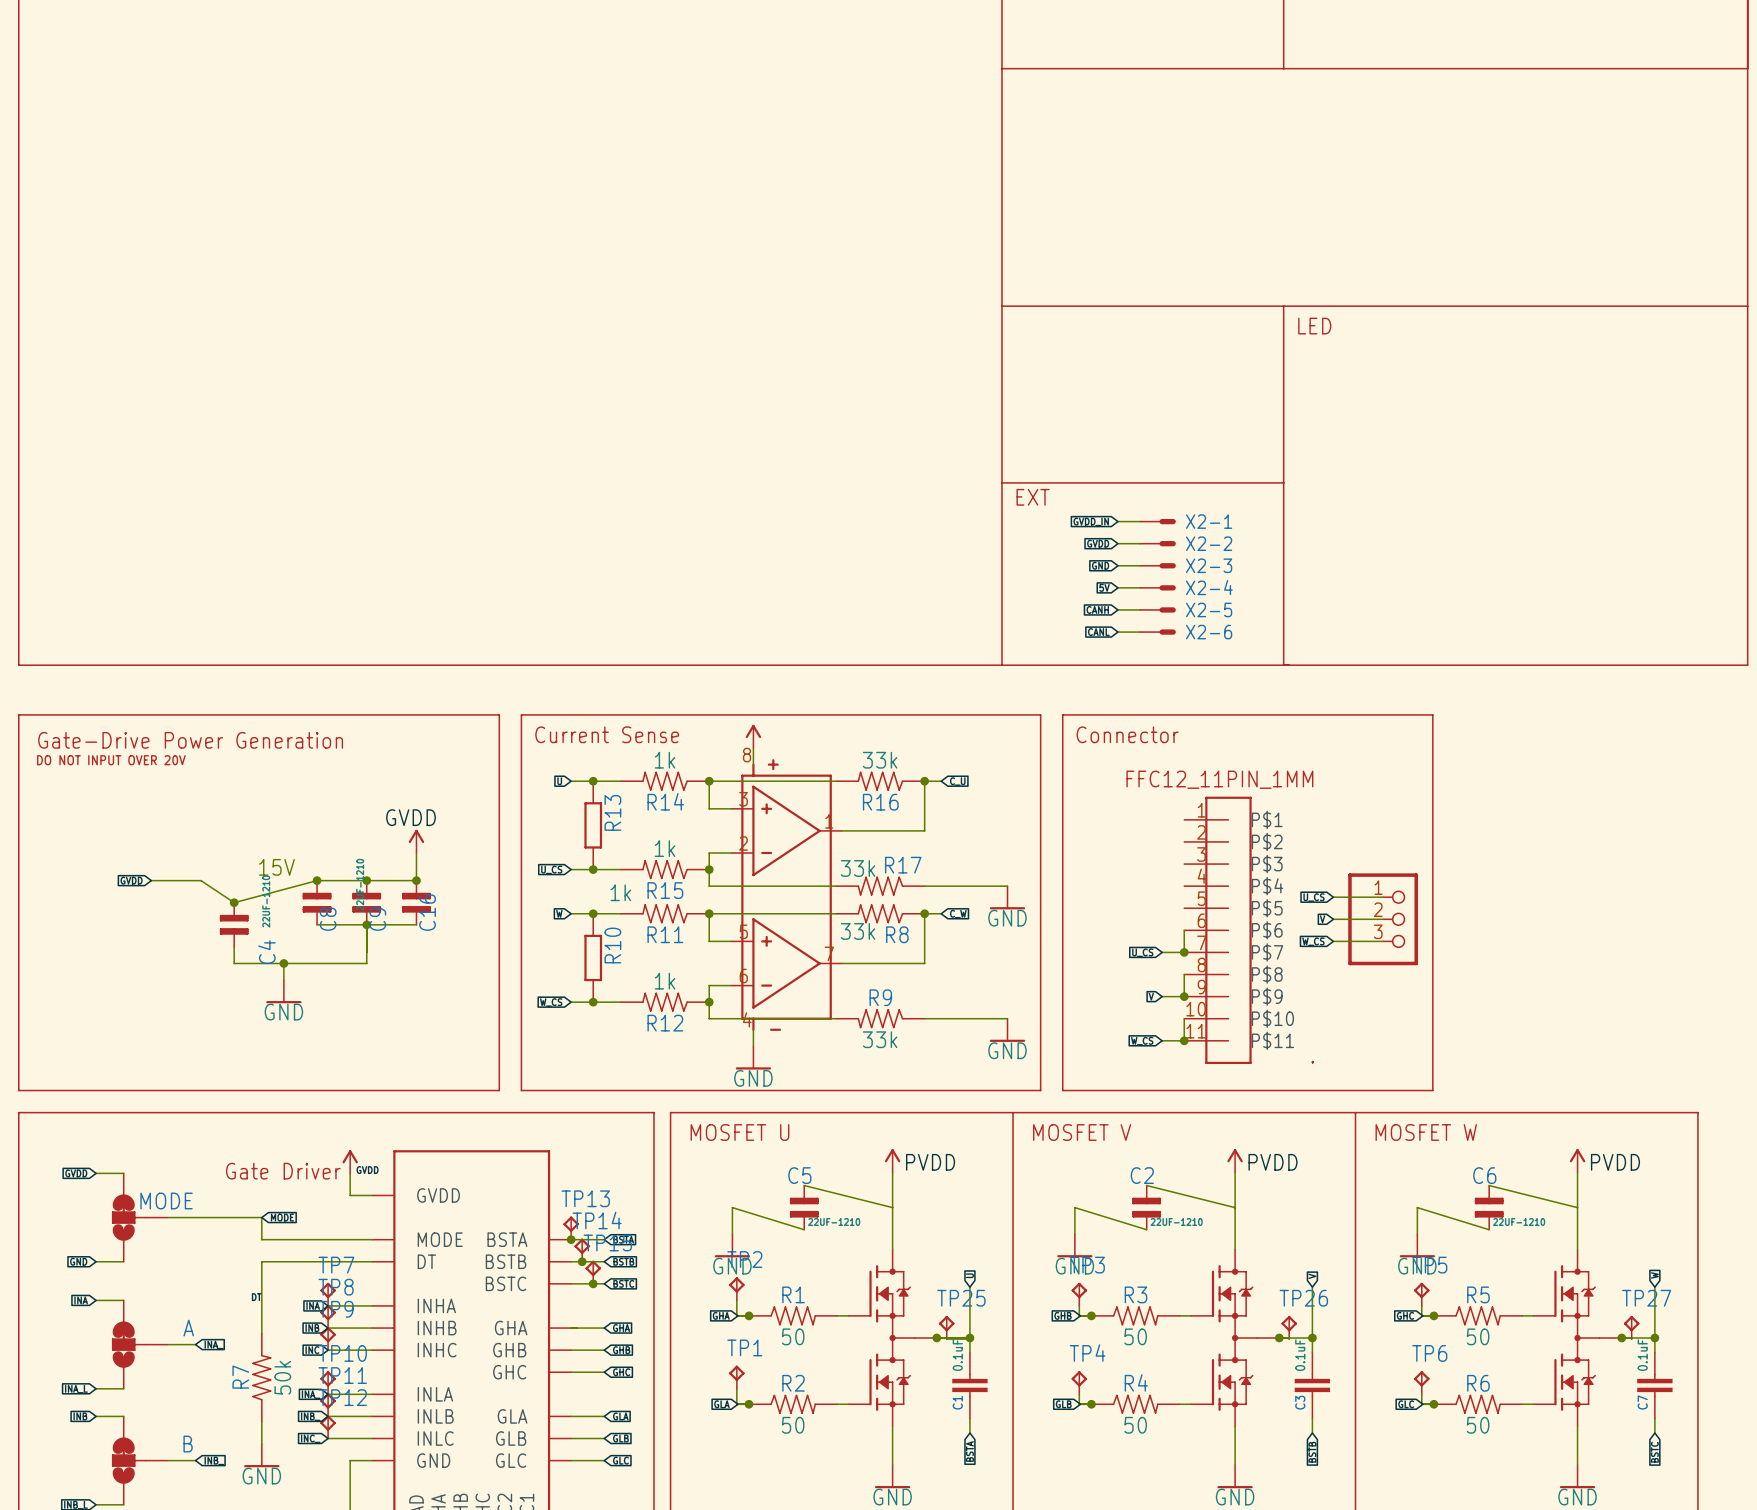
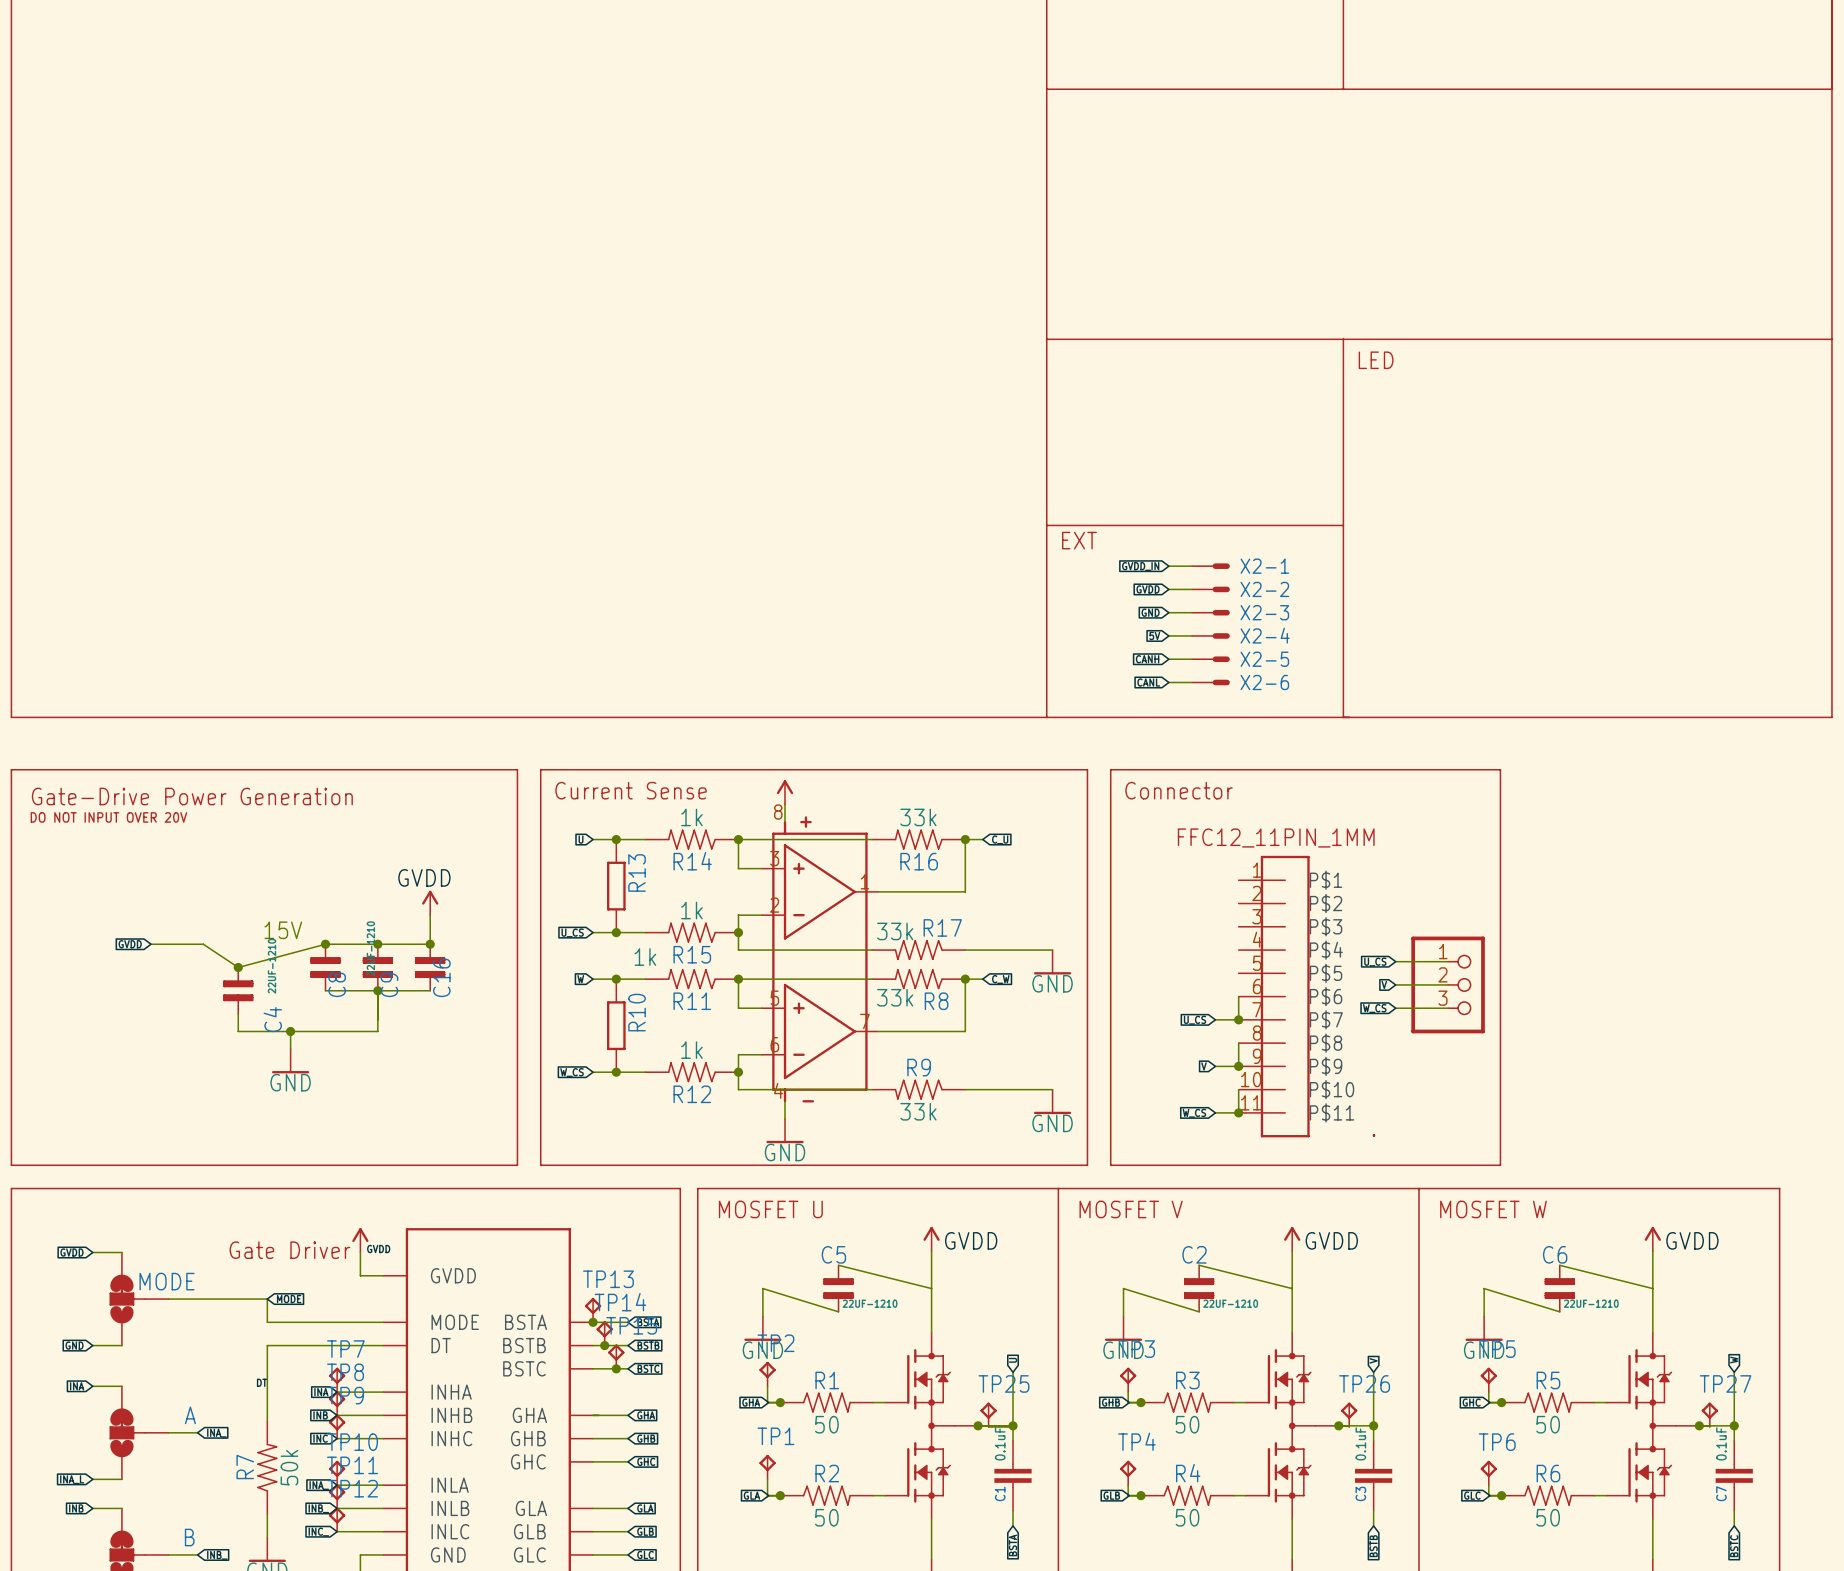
label: PVDD (930, 1162) -> GVDD (971, 1240)
label: PVDD (1273, 1162) -> GVDD (1331, 1240)
label: PVDD (1615, 1162) -> GVDD (1692, 1240)

